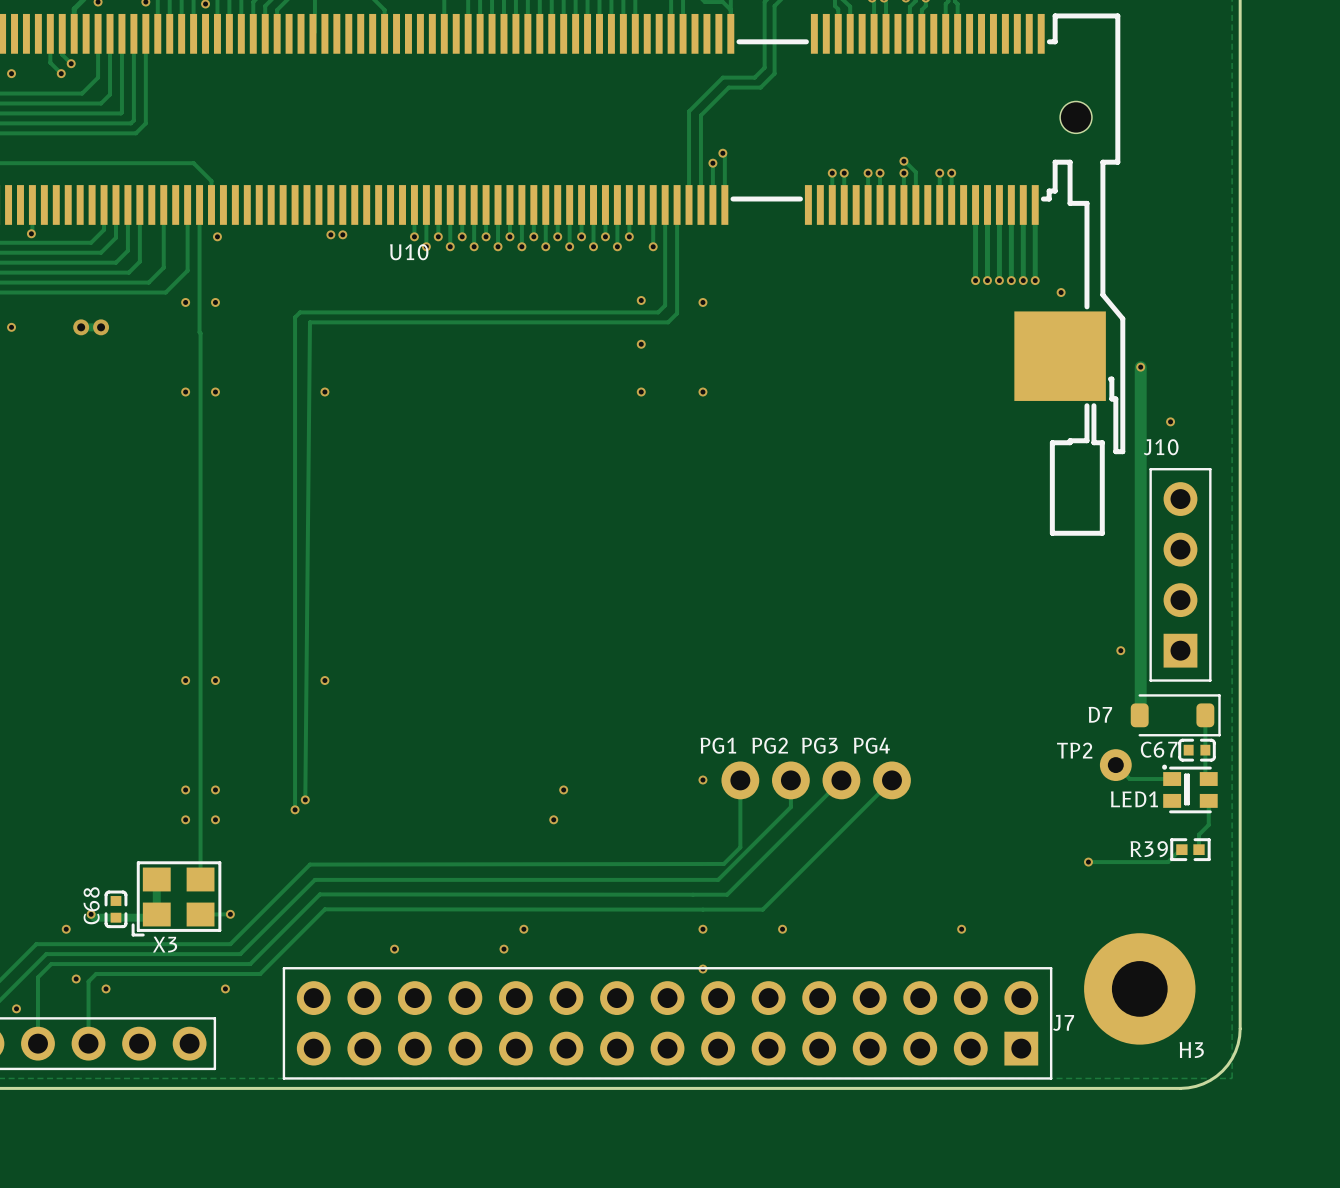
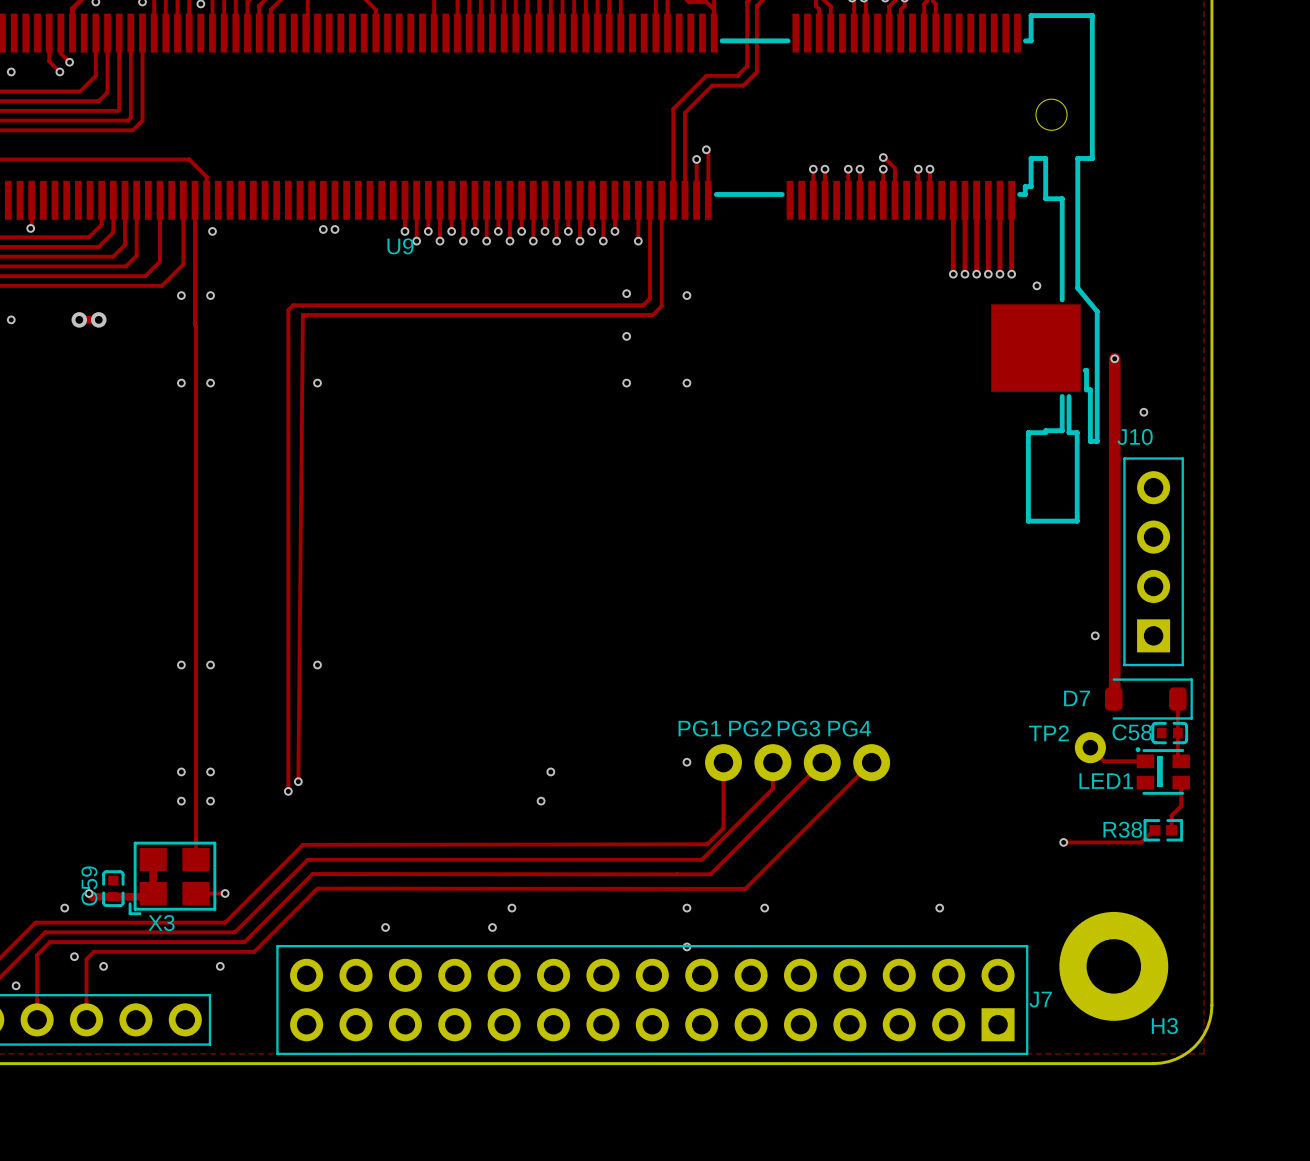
U10 name: U10 (409, 252) -> U9 (400, 246)
C67 name: C67 (1159, 749) -> C58 (1132, 732)
R39 name: R39 (1149, 849) -> R38 (1122, 829)
C68 name: C68 (91, 905) -> C59 (89, 885)

